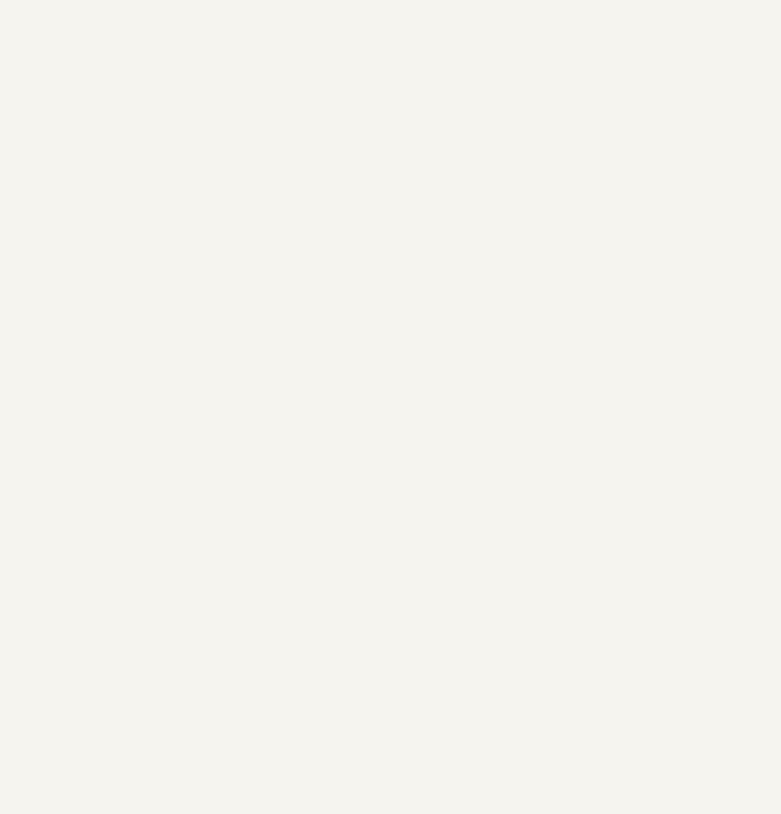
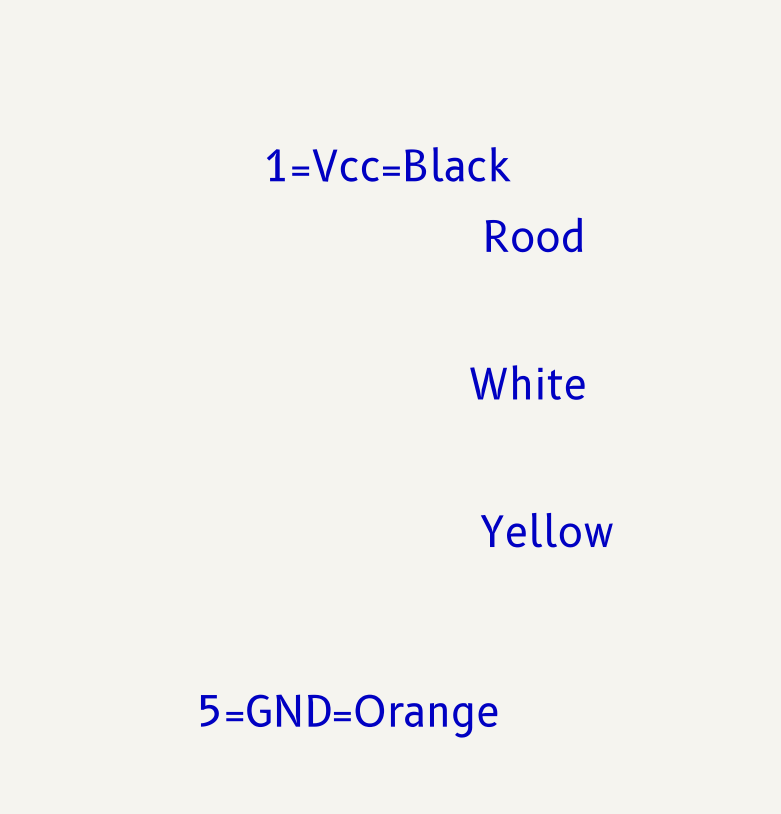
text: none -> 1=Vcc=Black (388, 164)
text: none -> Rood (534, 234)
text: none -> White (527, 382)
text: none -> Yellow (546, 530)
text: none -> 5=GND=Orange (349, 716)

